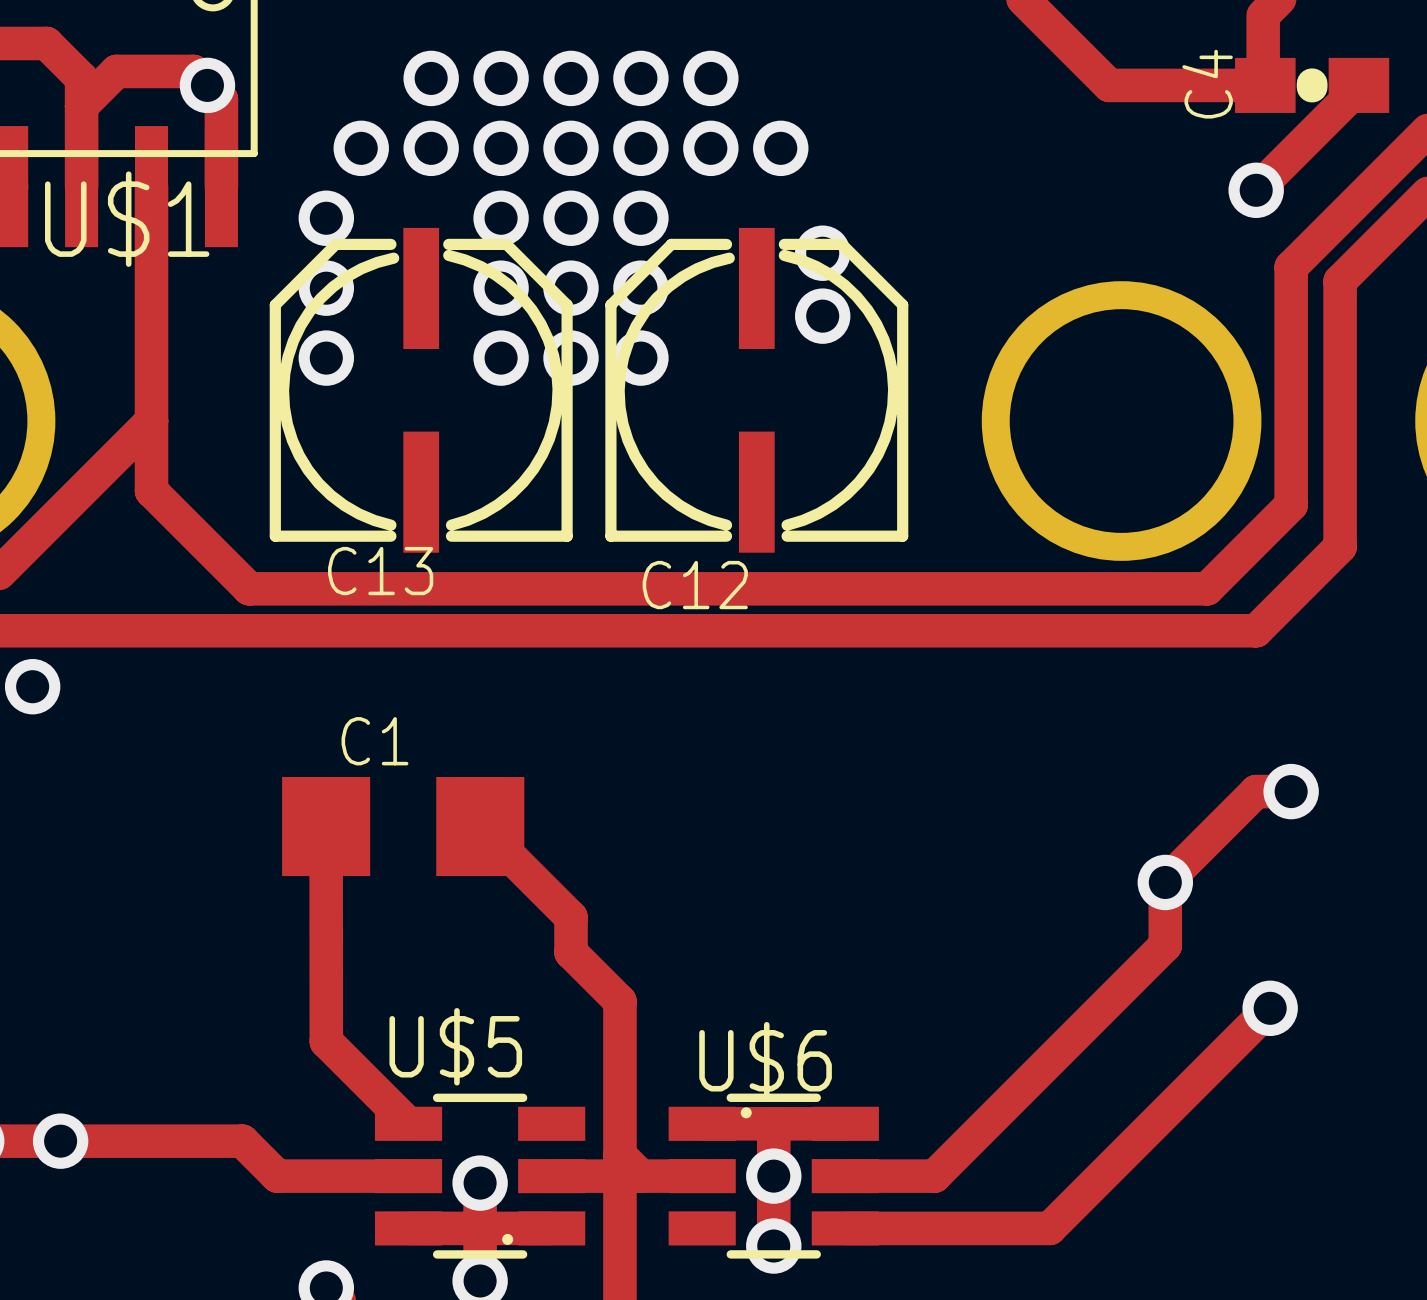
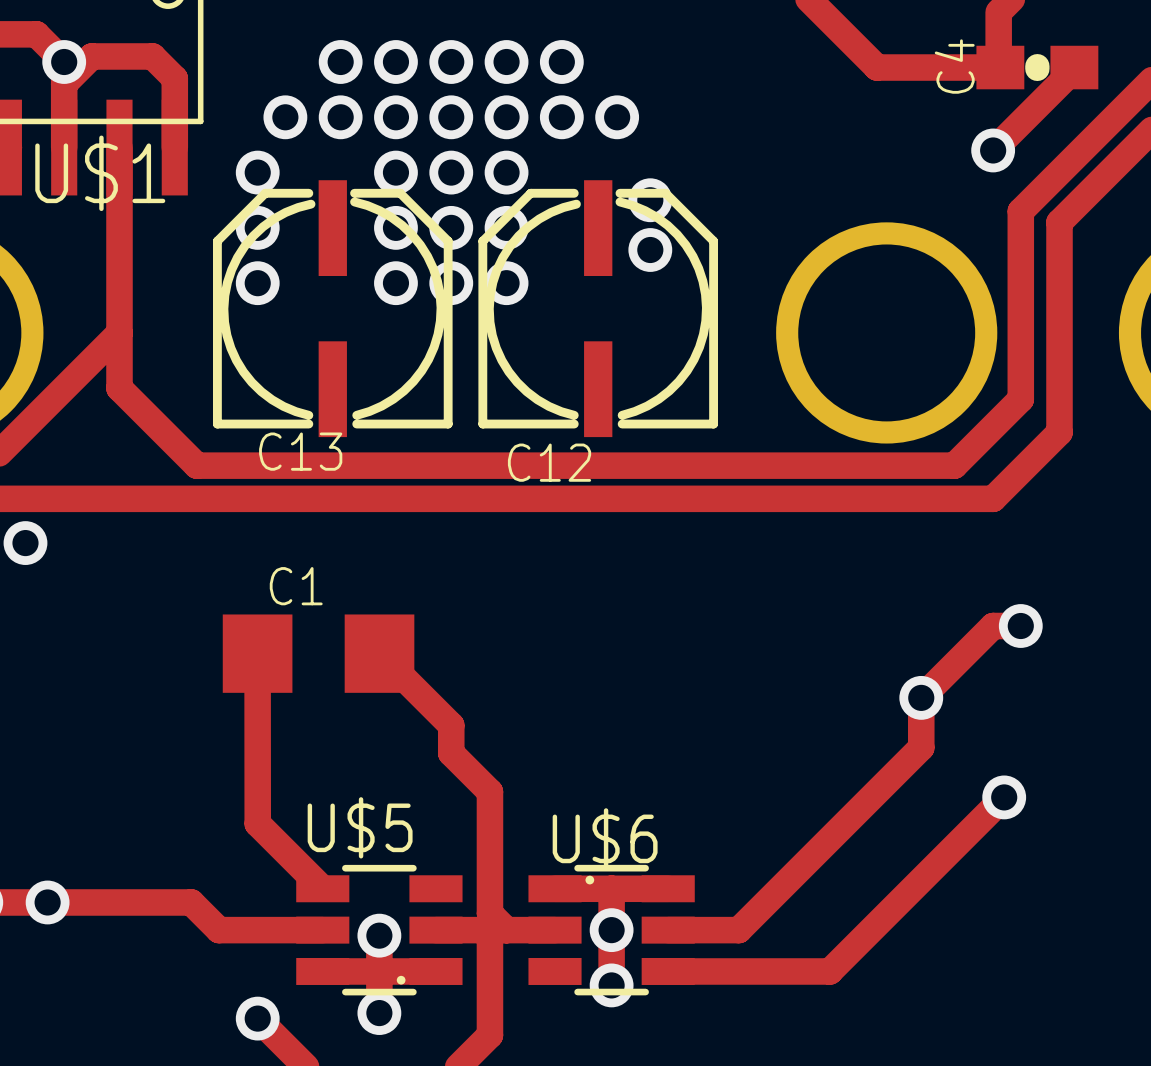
via position: (207, 85) -> (64, 62)

